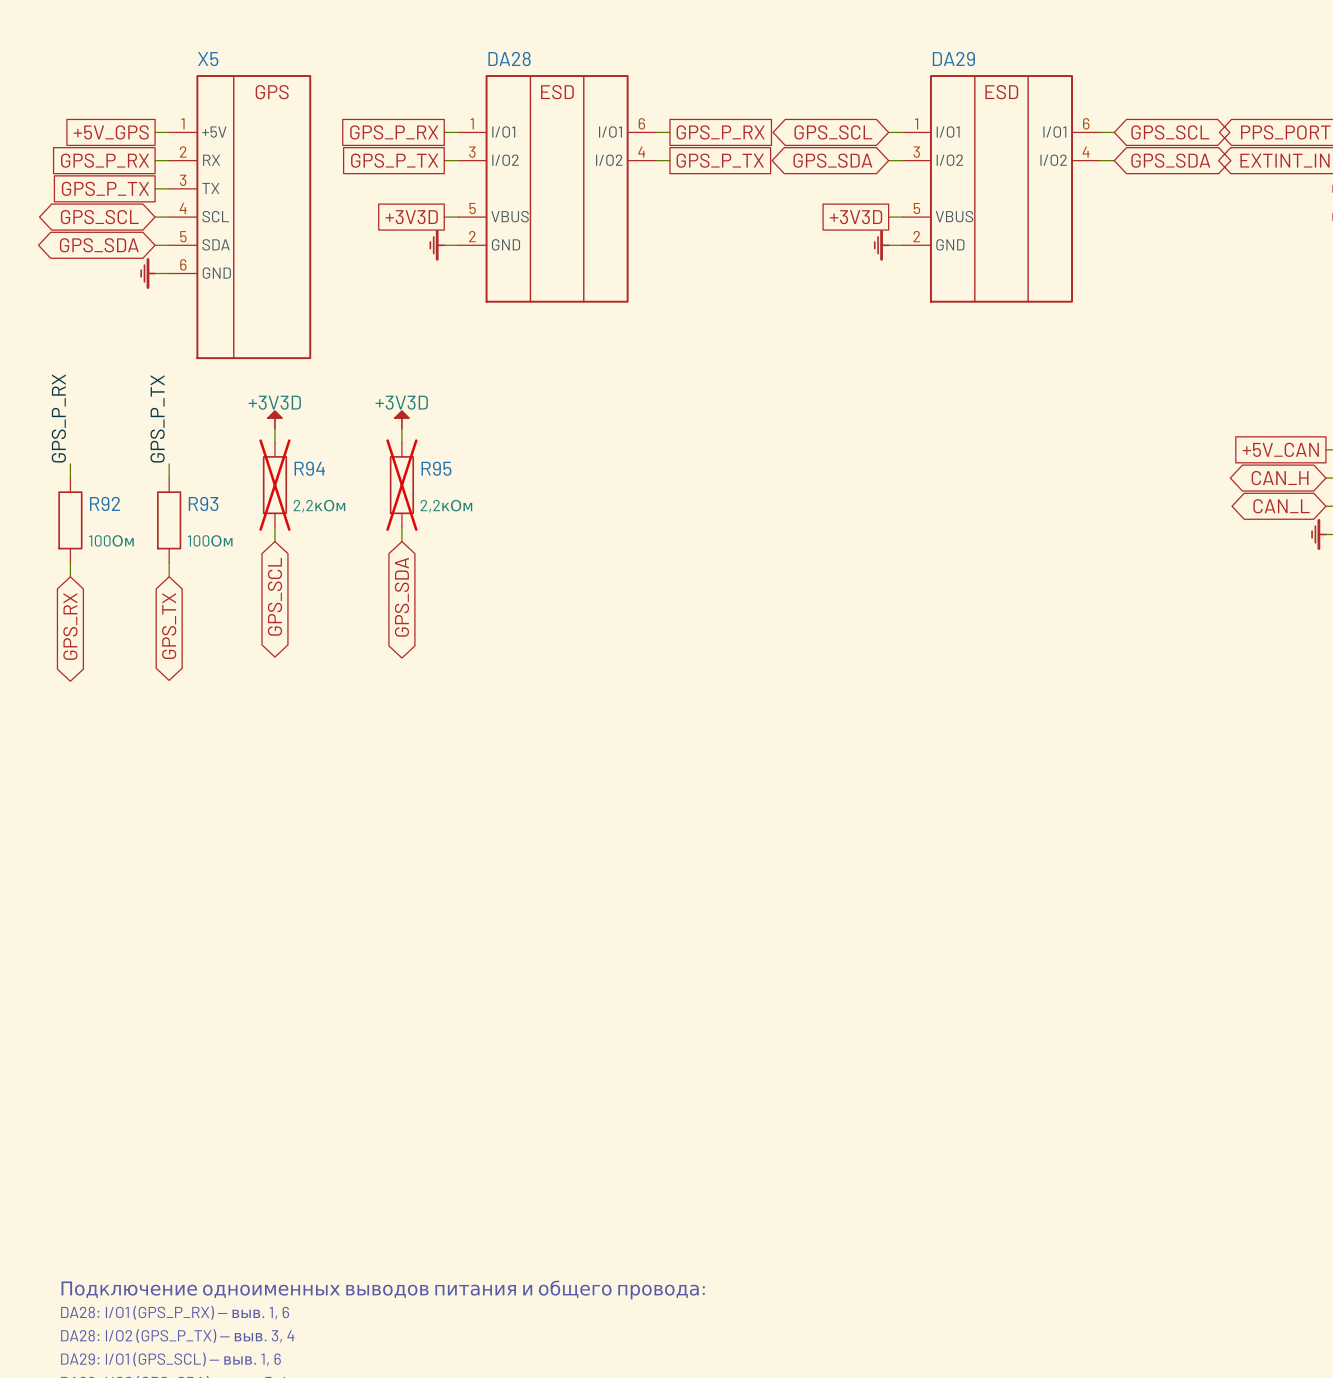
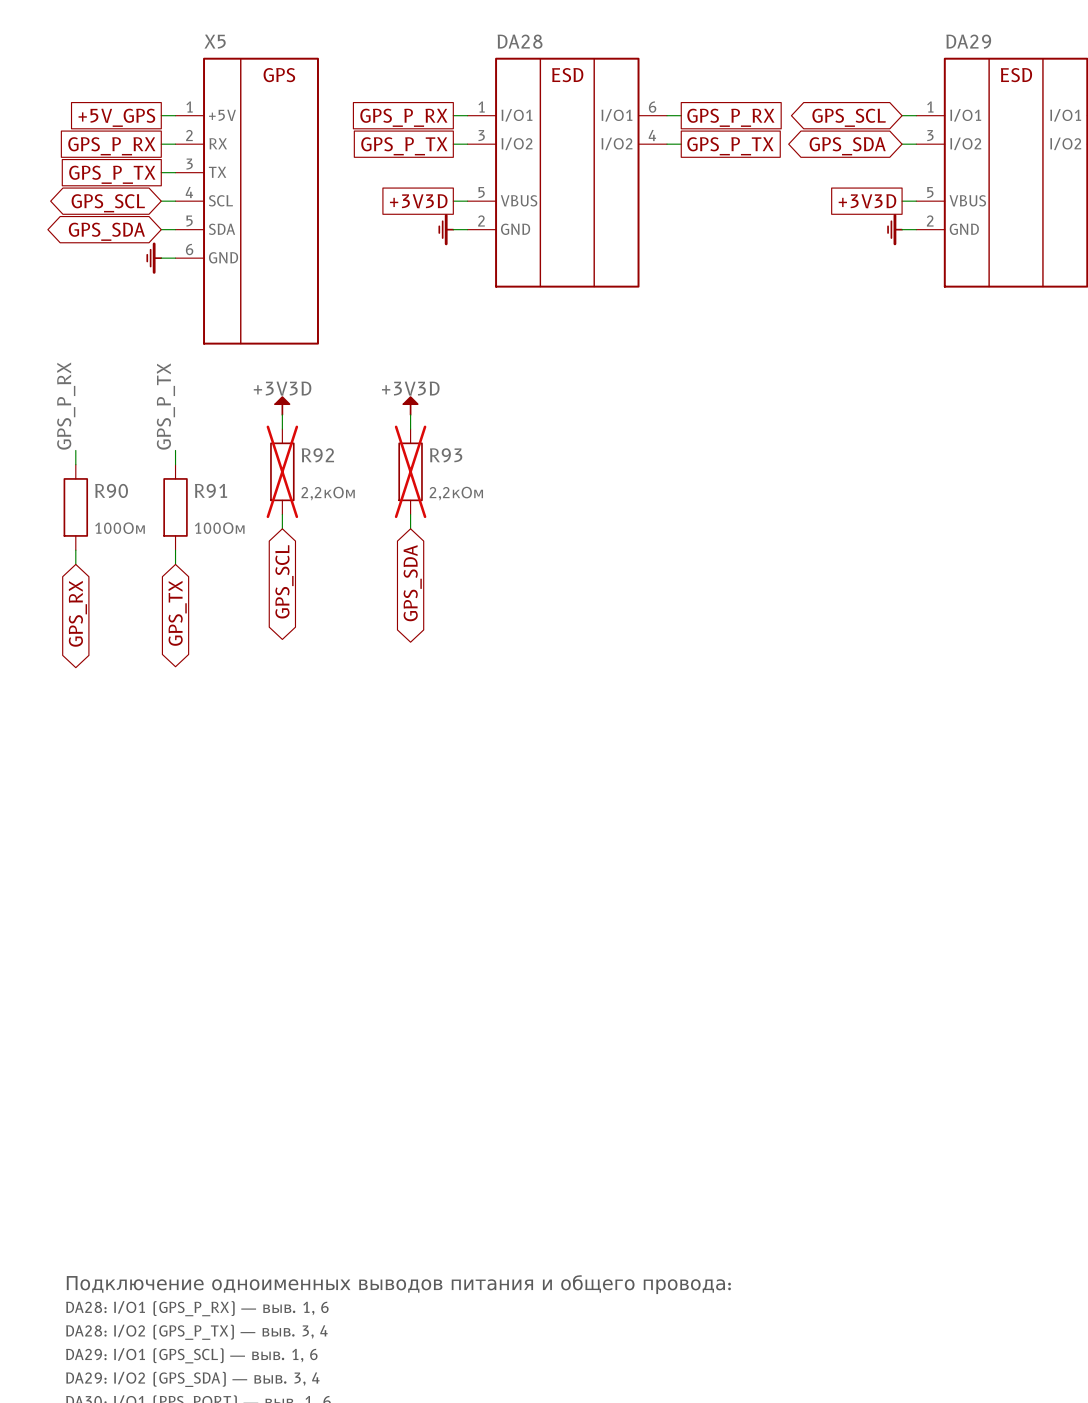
R94 name: R94 (309, 468) -> R92 (317, 455)
R95 name: R95 (436, 468) -> R93 (446, 455)
R92 name: R92 (105, 503) -> R90 (111, 490)
R93 name: R93 (203, 503) -> R91 (211, 490)

